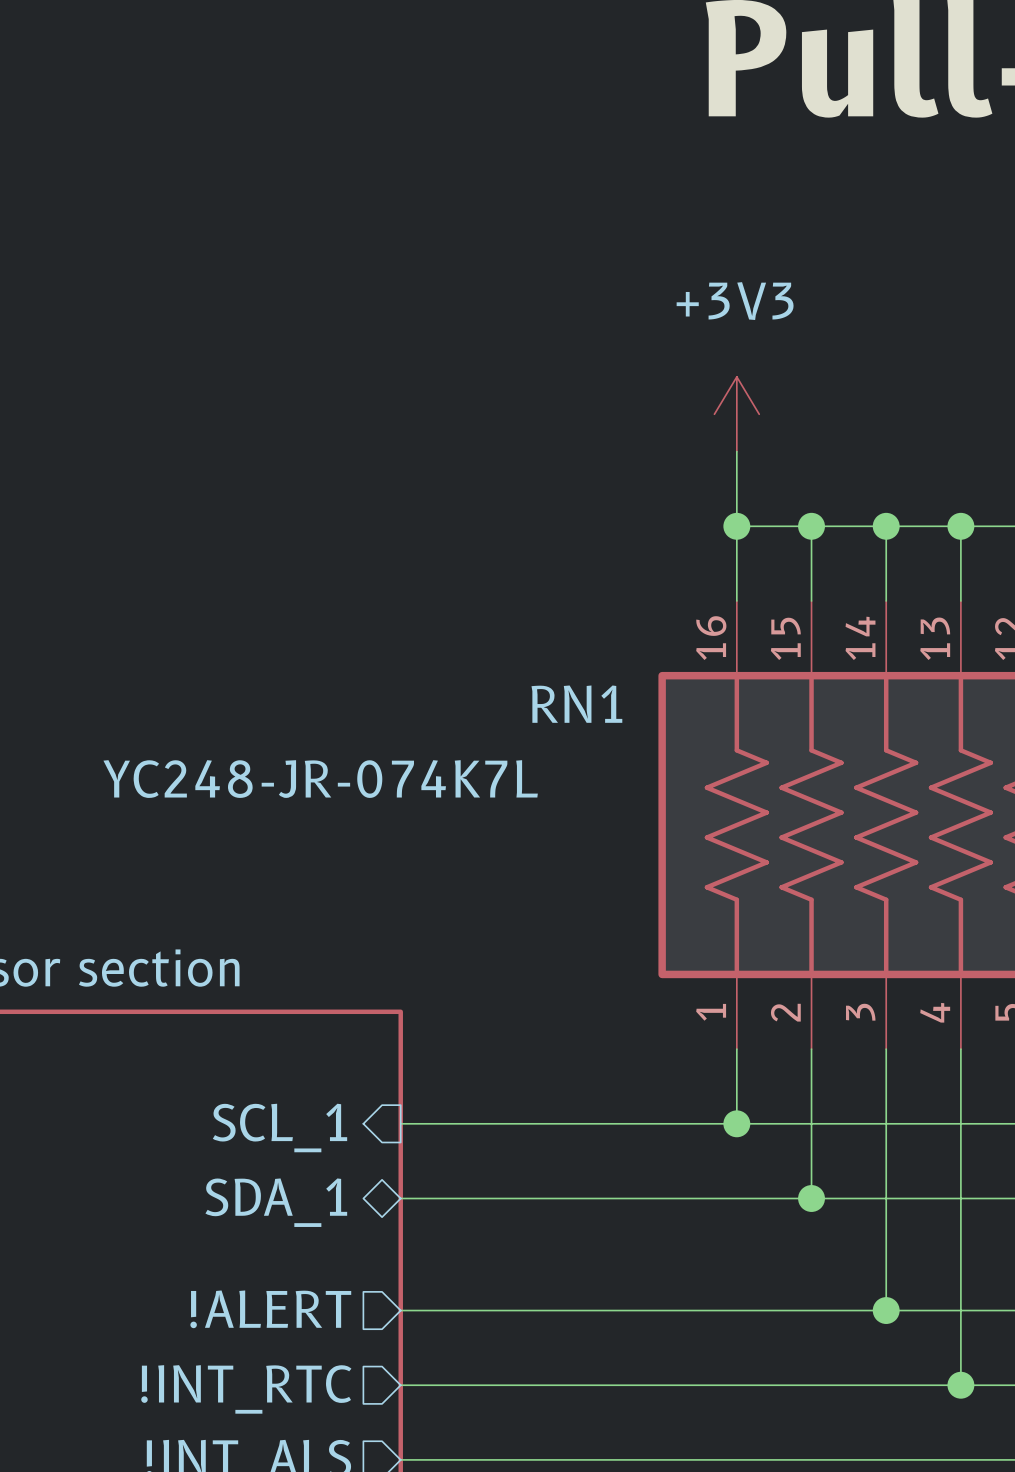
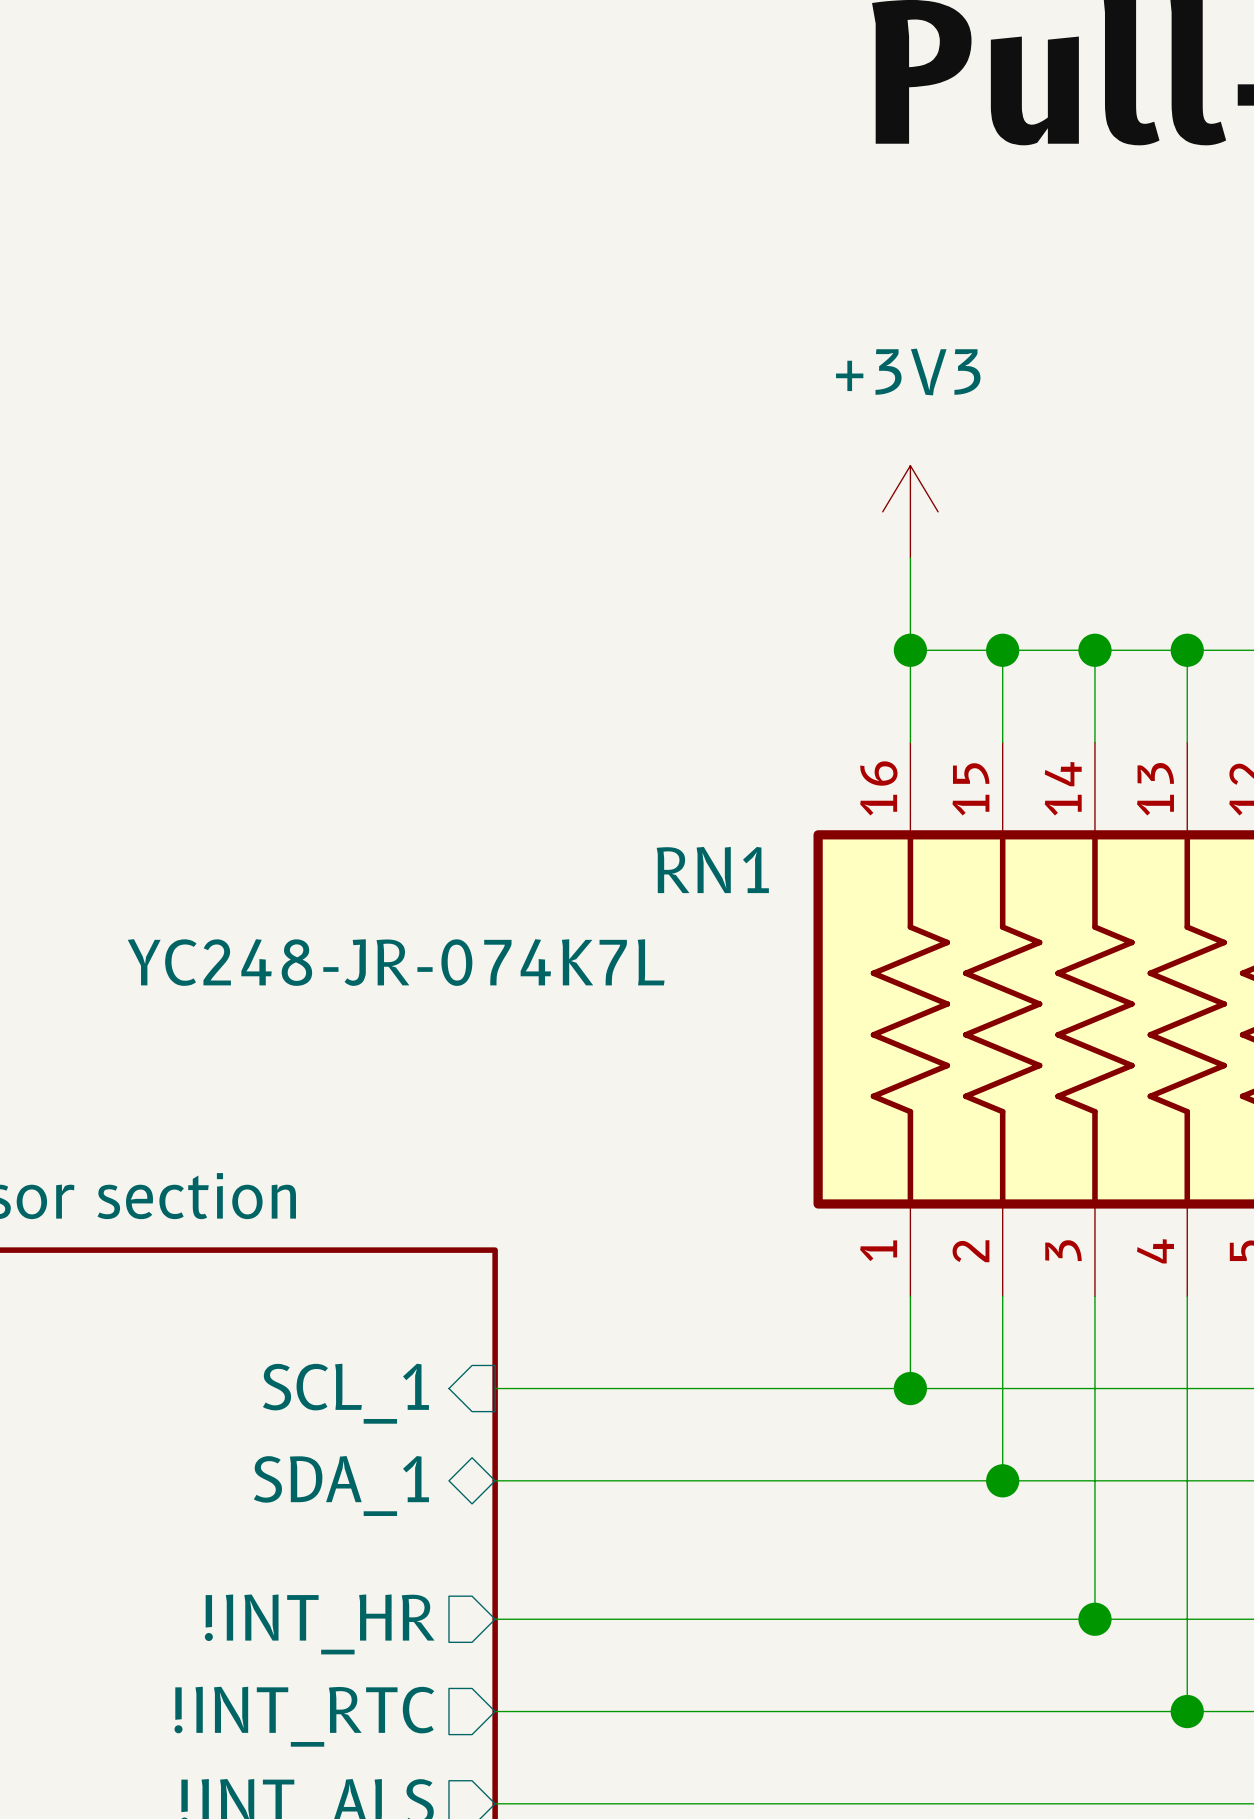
sheet pin: !ALERT (270, 1309) -> !INT_HR (319, 1624)

